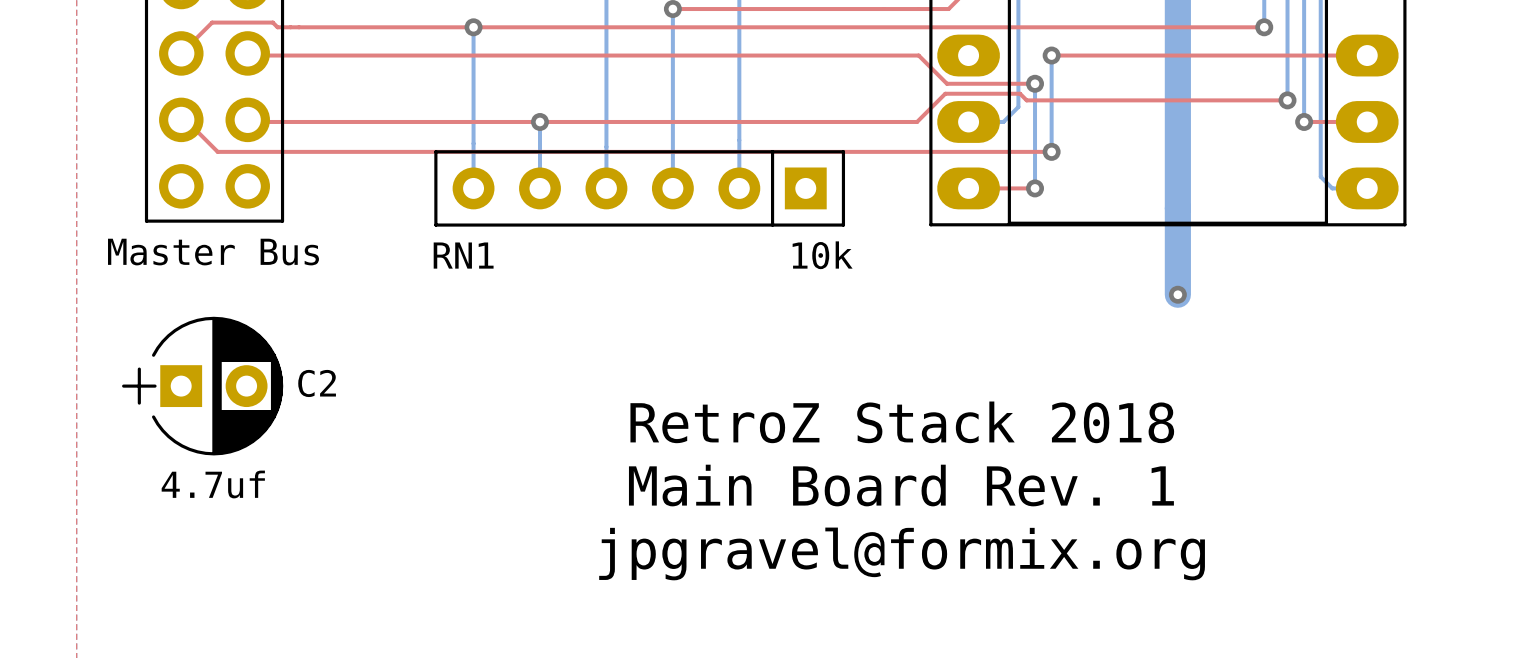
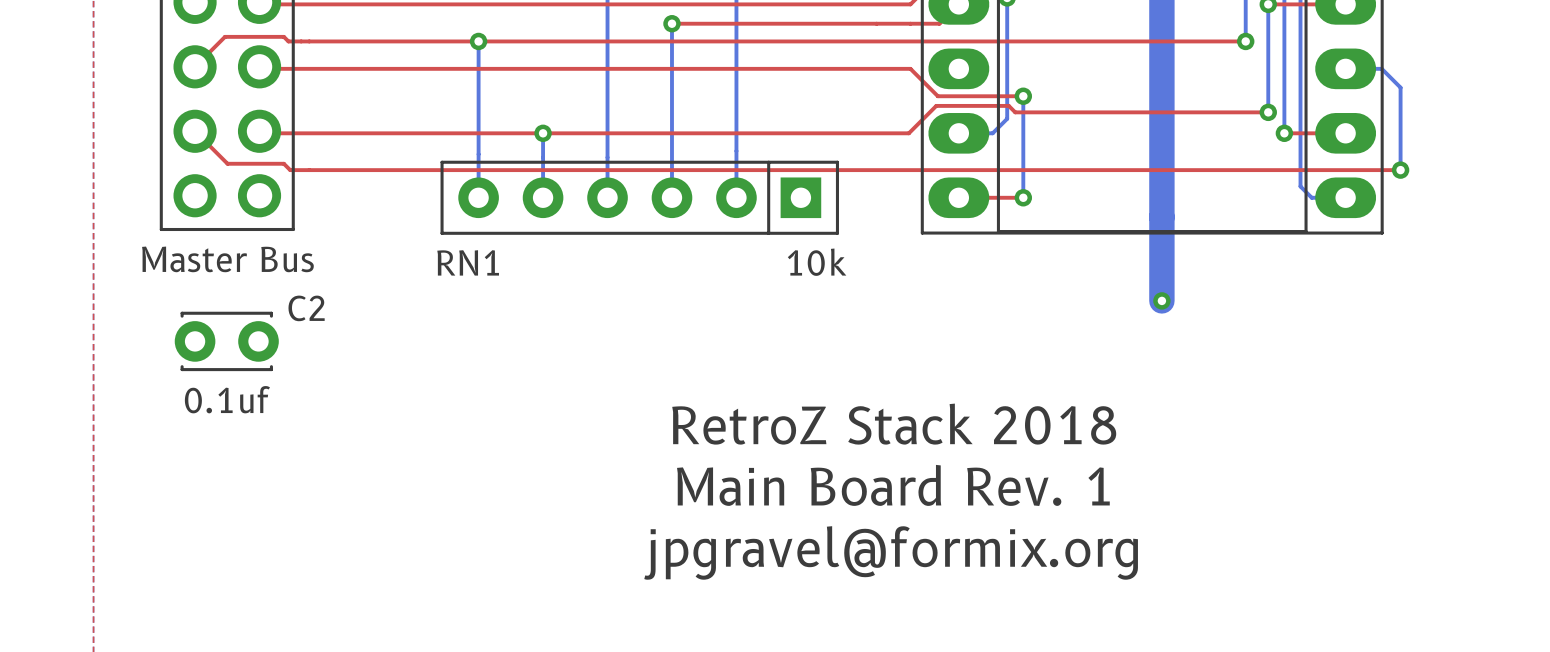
top track: (1051, 55) (1367, 55) -> none
bottom track: (1051, 55) (1051, 151) -> none
via: (1051, 55) -> none
bottom track: none -> (1345, 68) (1381, 68) (1400, 87) (1400, 170)
top track: (181, 119) (185, 119) (217, 151) (1051, 151) -> (195, 131) (227, 163) (283, 163) (290, 170) (1400, 170)
via: (1051, 151) -> none
via: none -> (1400, 170)
C2 footprint: [122, 316, 284, 456] -> [174, 311, 279, 372]
C2 value: 4.7uf (213, 484) -> 0.1uf (227, 399)

